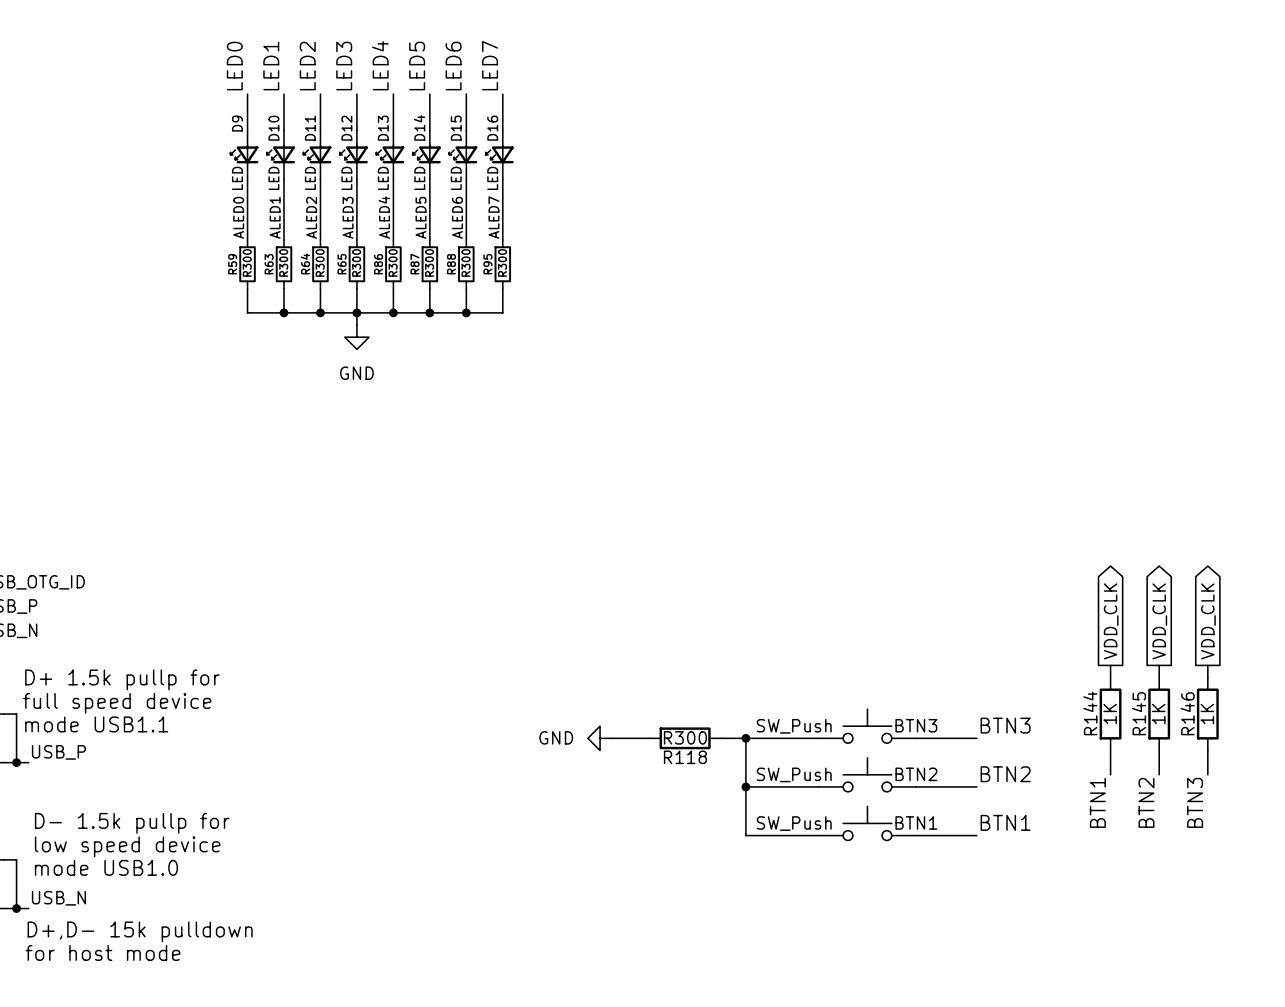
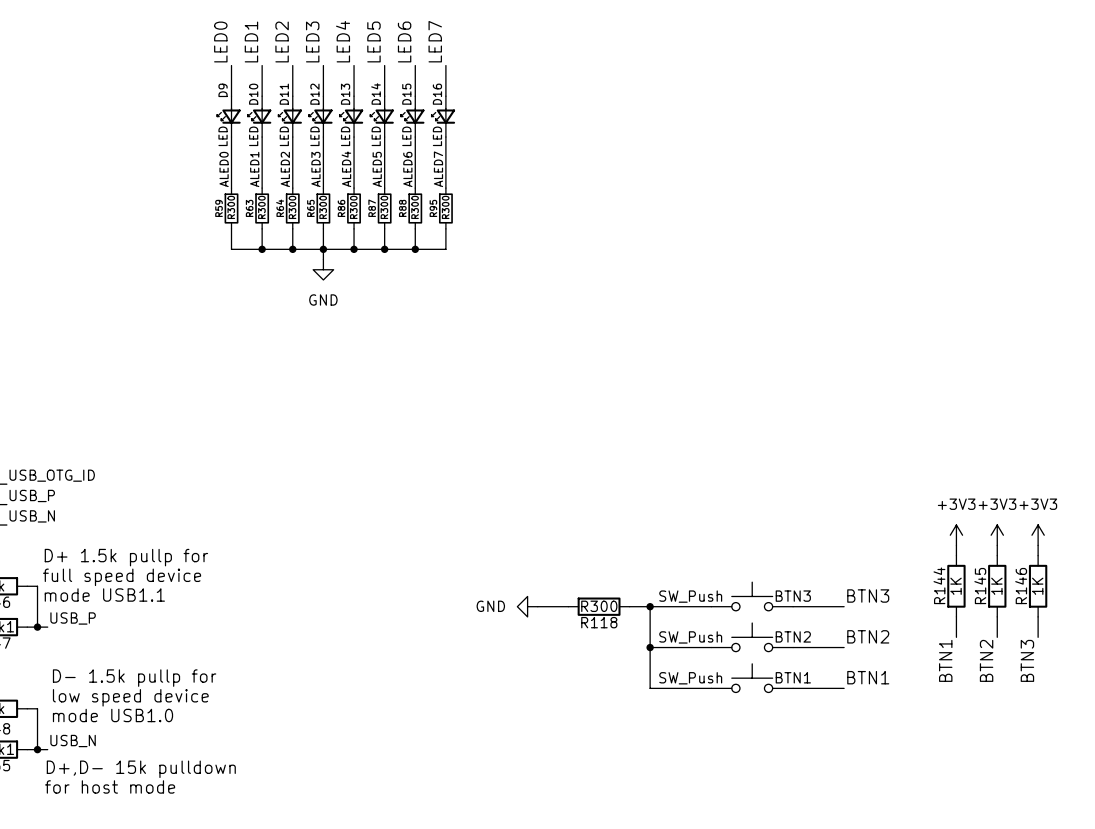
global label: VDD_CLK (1111, 621) -> none
global label: VDD_CLK (1159, 621) -> none
global label: VDD_CLK (1208, 621) -> none
power symbol: none -> +3V3 (956, 535)
power symbol: none -> +3V3 (997, 535)
power symbol: none -> +3V3 (1038, 535)

